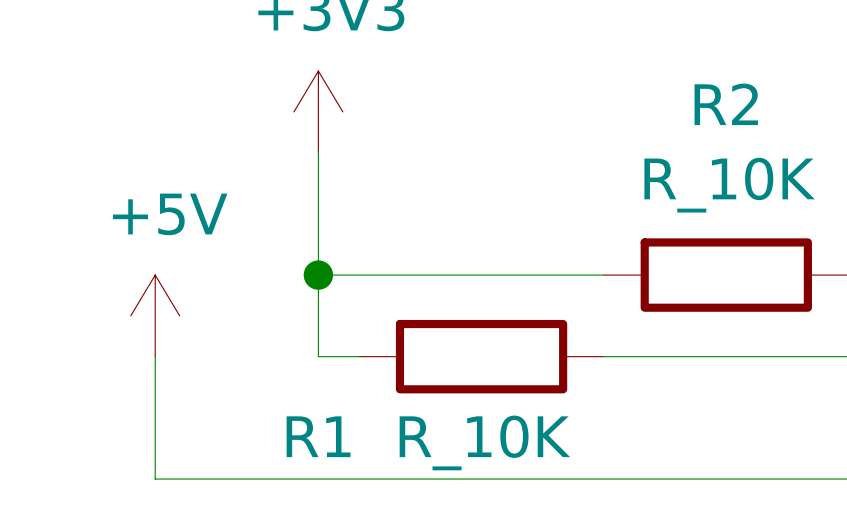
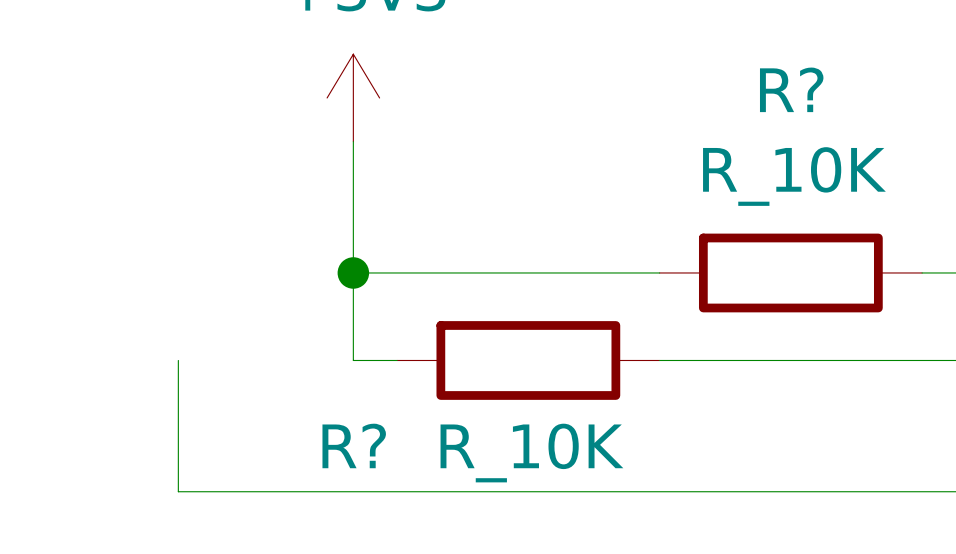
R2 name: R2 (726, 104) -> R? (791, 89)
power symbol: +5V (155, 315) -> none
R1 name: R1 (318, 436) -> R? (354, 445)

